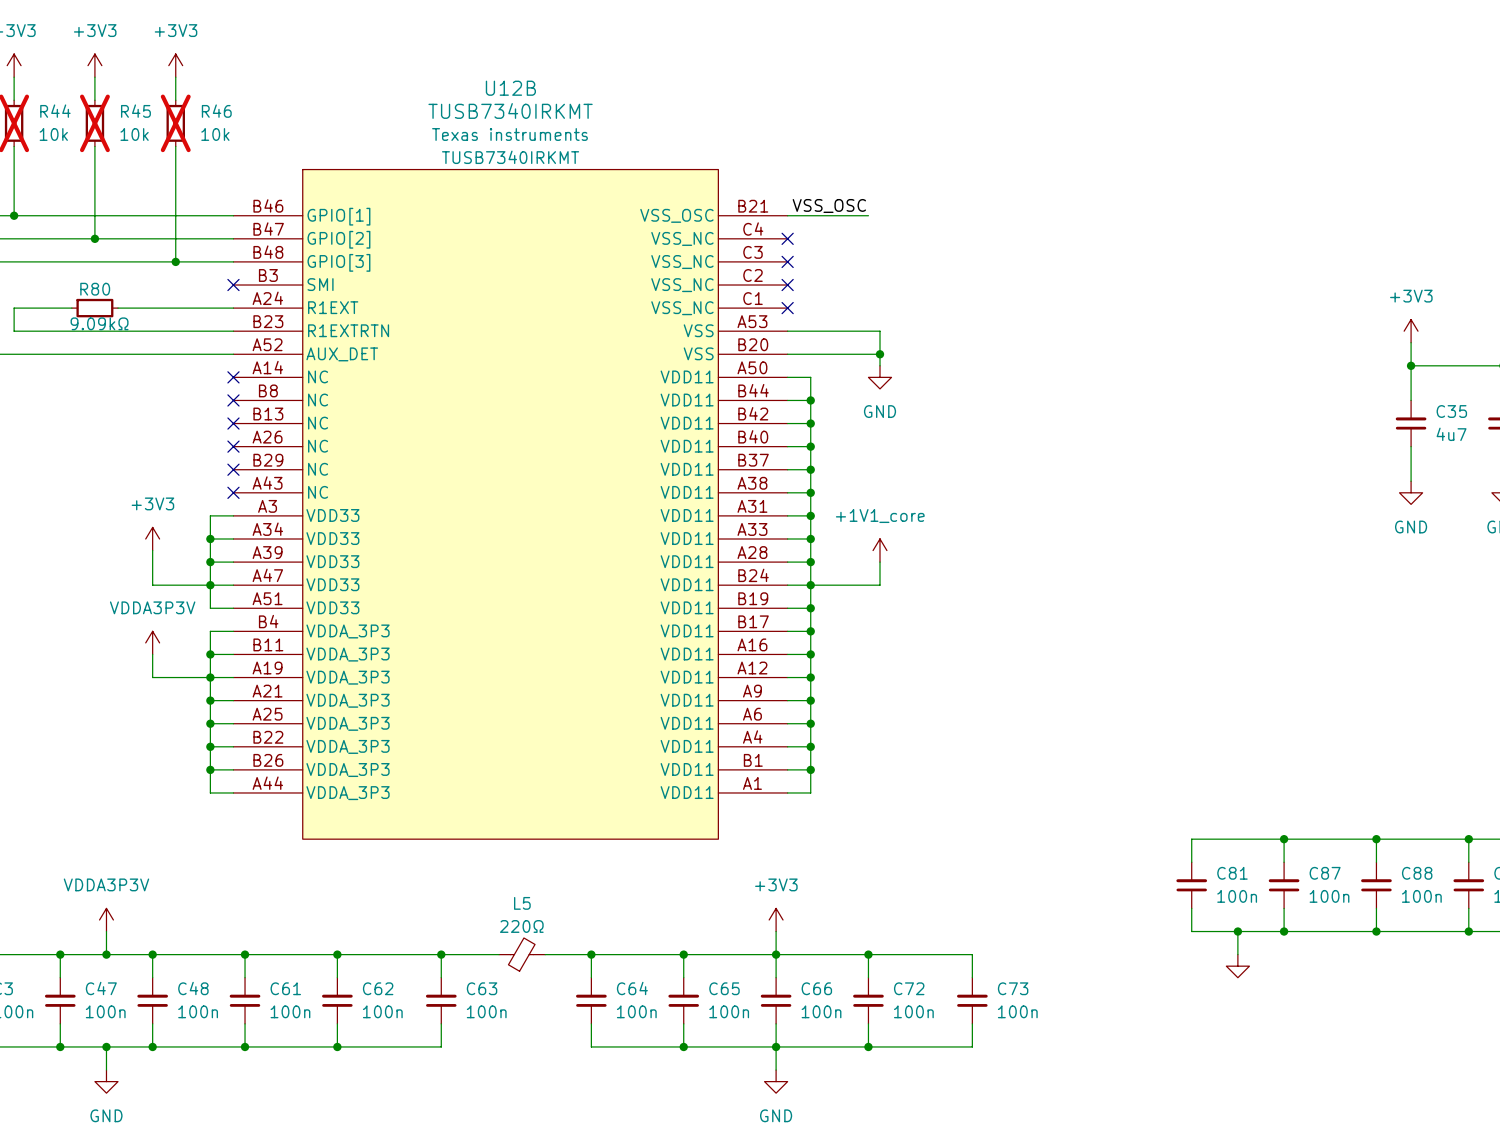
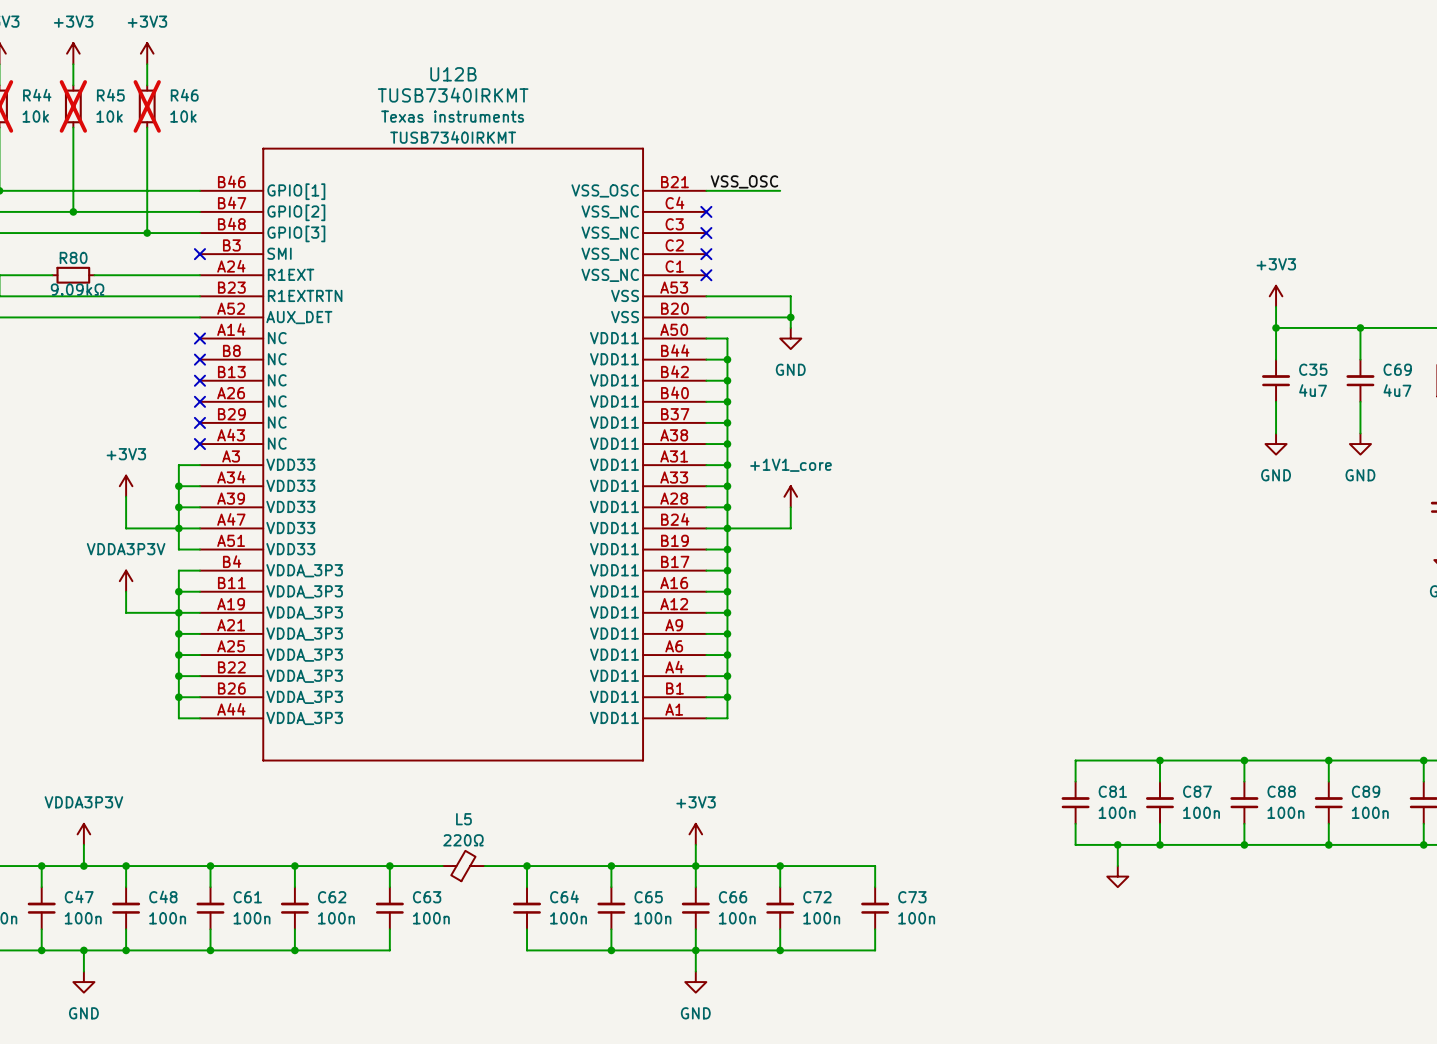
U12B symbol: [233, 169, 788, 840] -> [199, 148, 707, 762]

